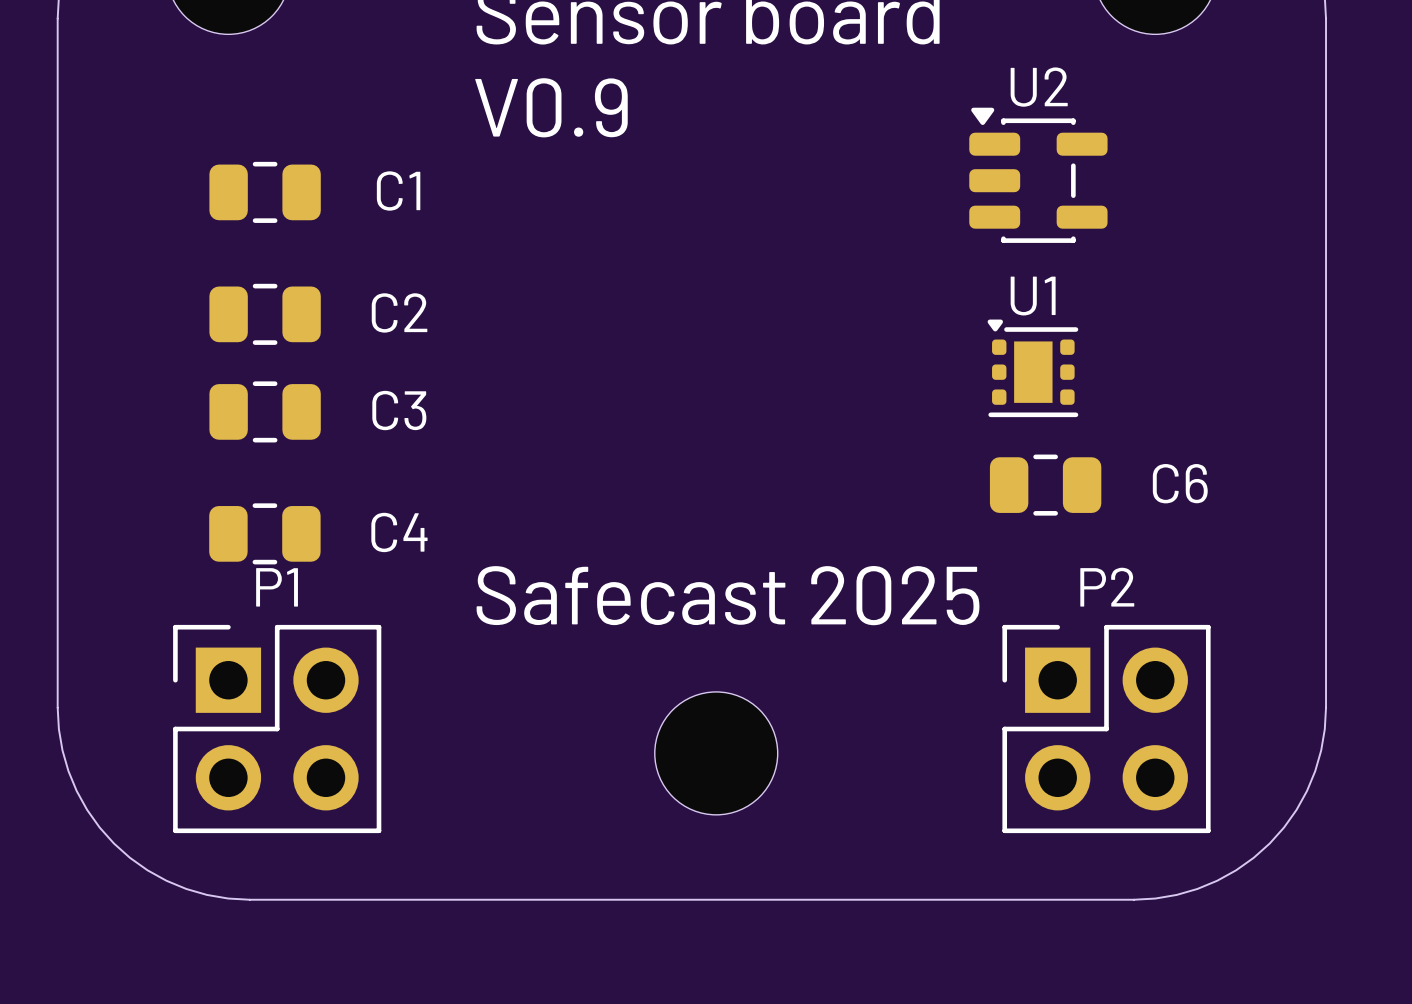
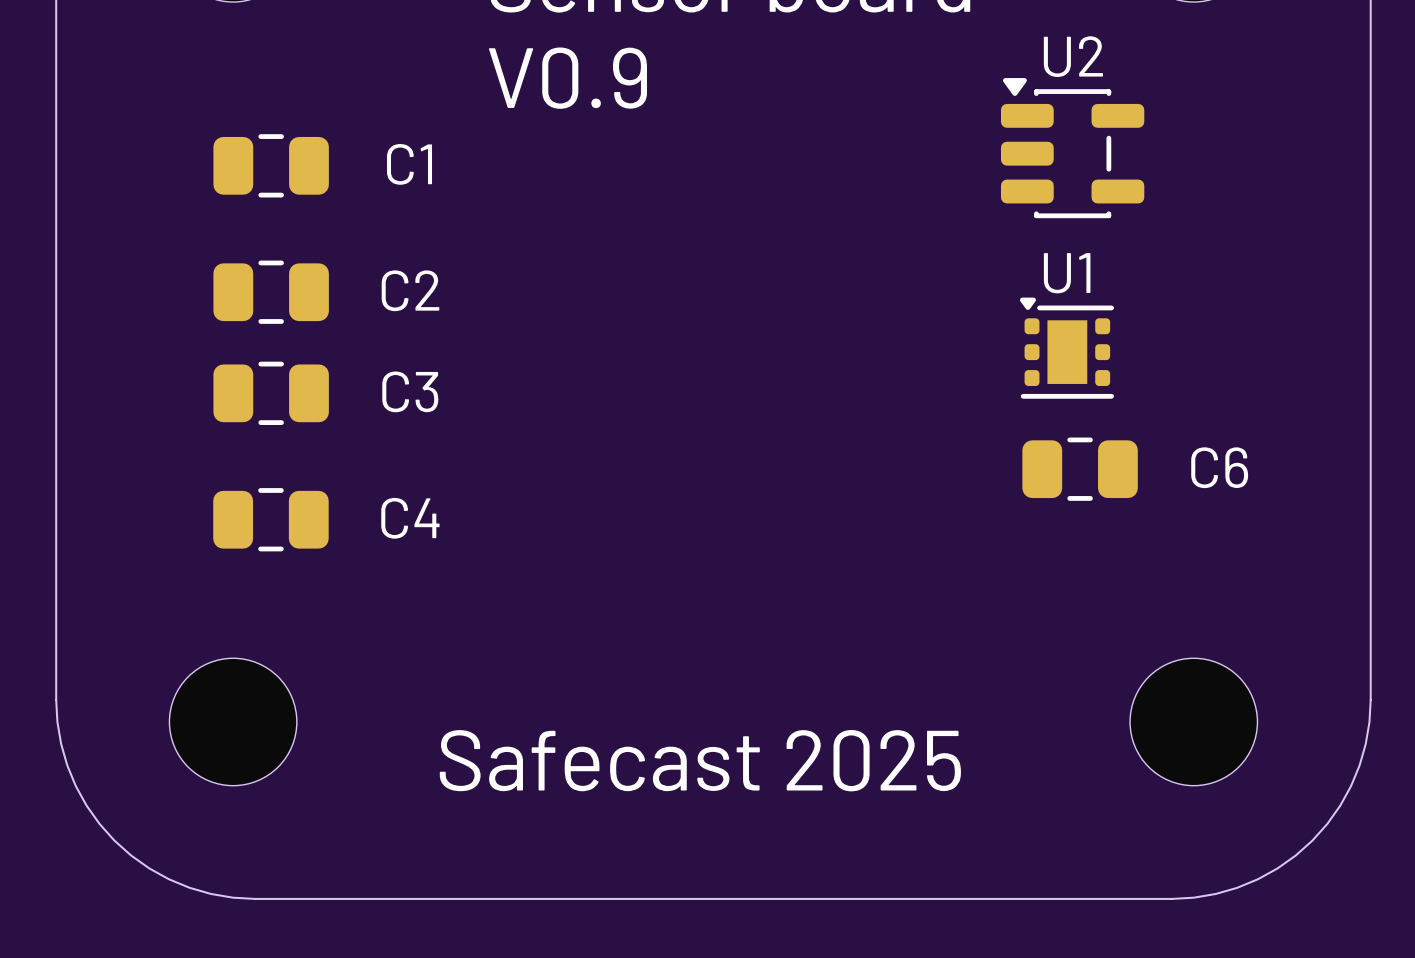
text position: Safecast 2025 (728, 595) -> Safecast 2025 (700, 760)
part: none -> (233, 721)
P1: (277, 729) -> none
P2: (1106, 729) -> none
part: none -> (1193, 721)
part: (716, 753) -> none

